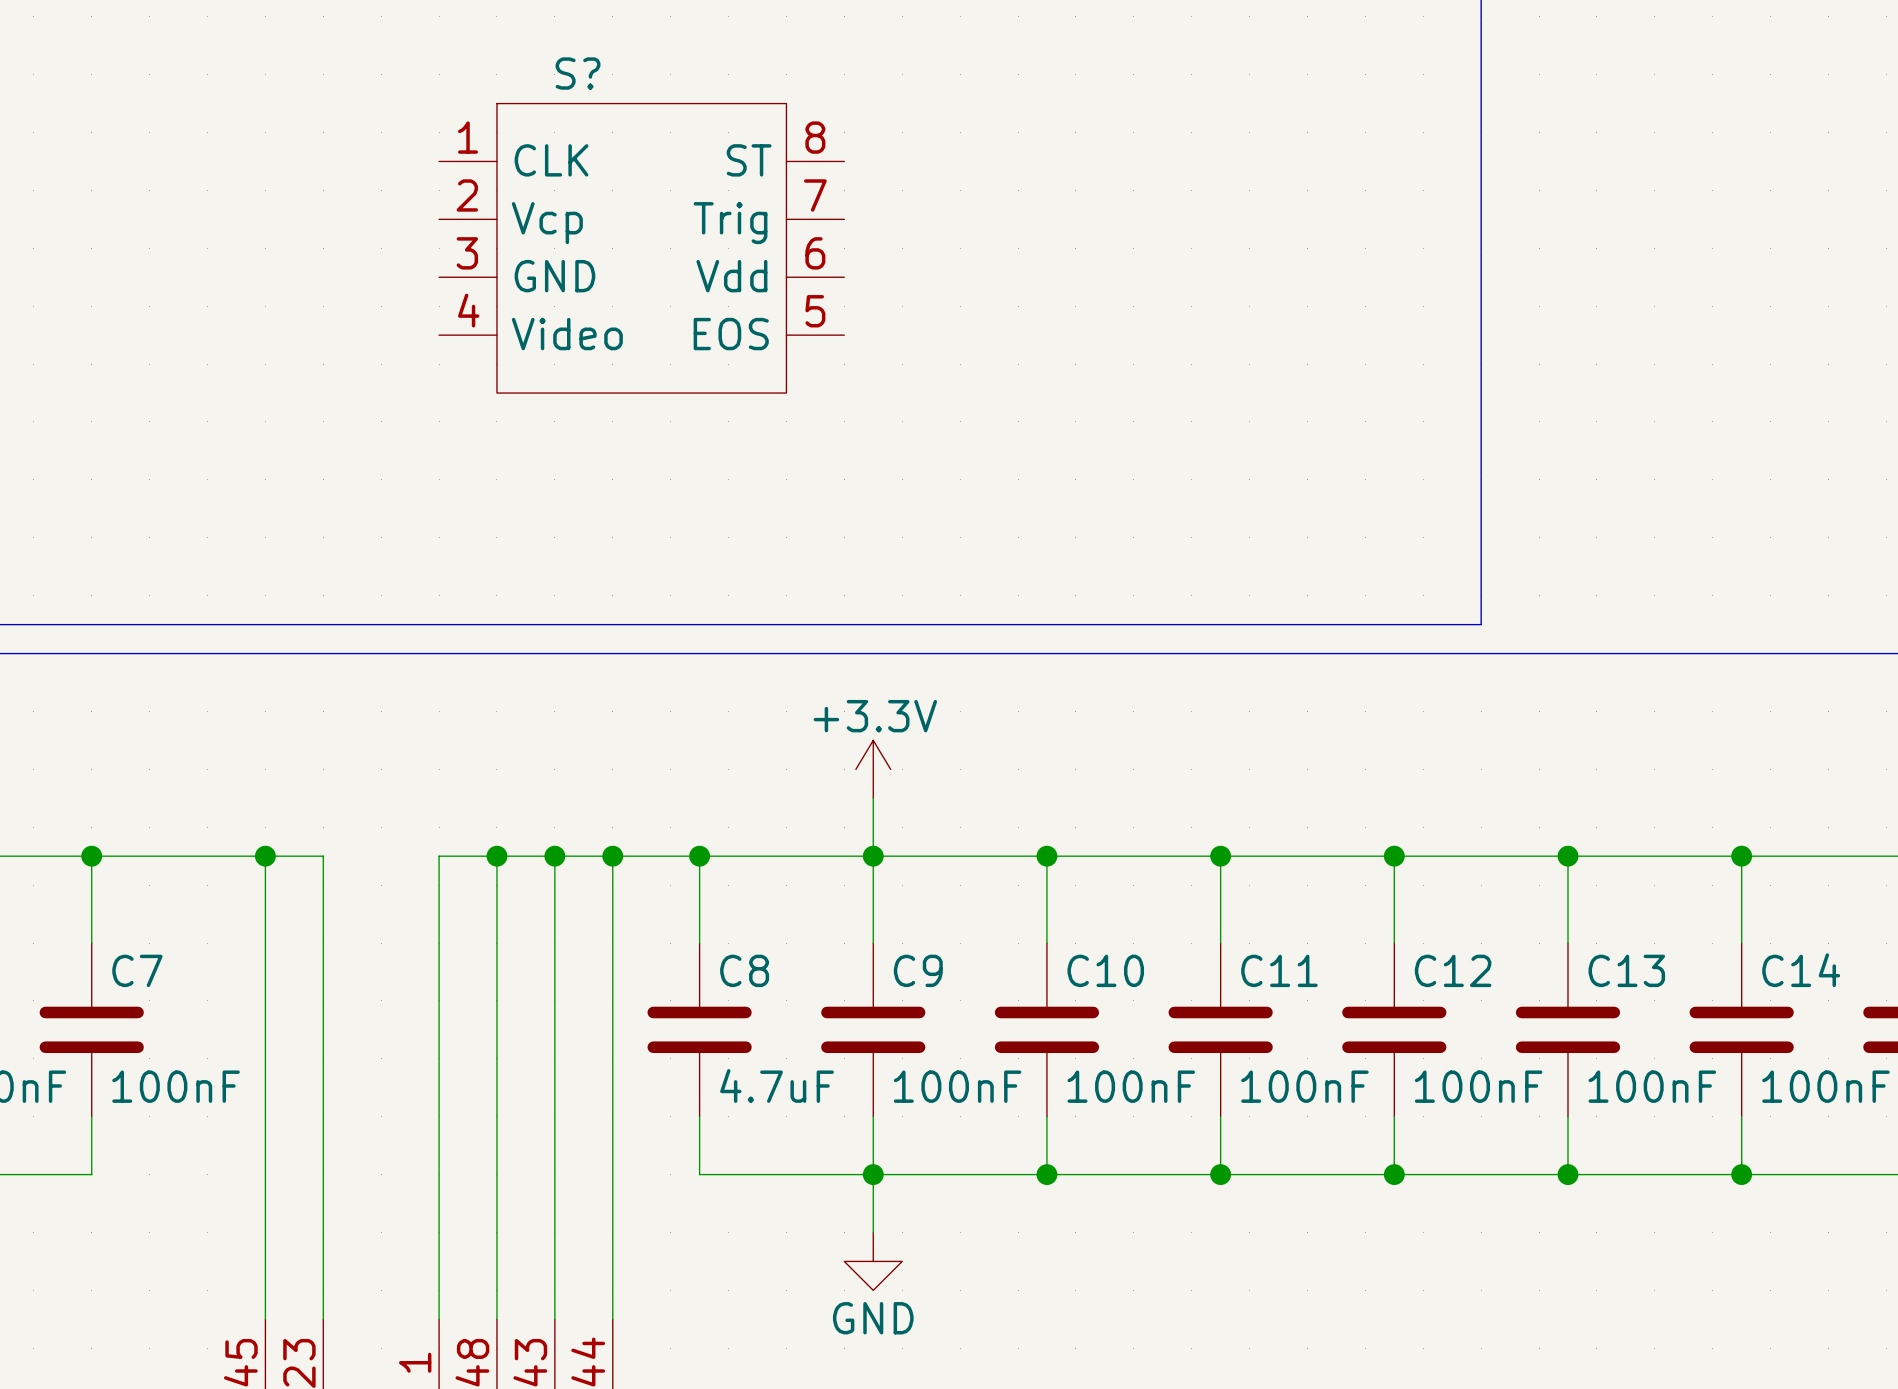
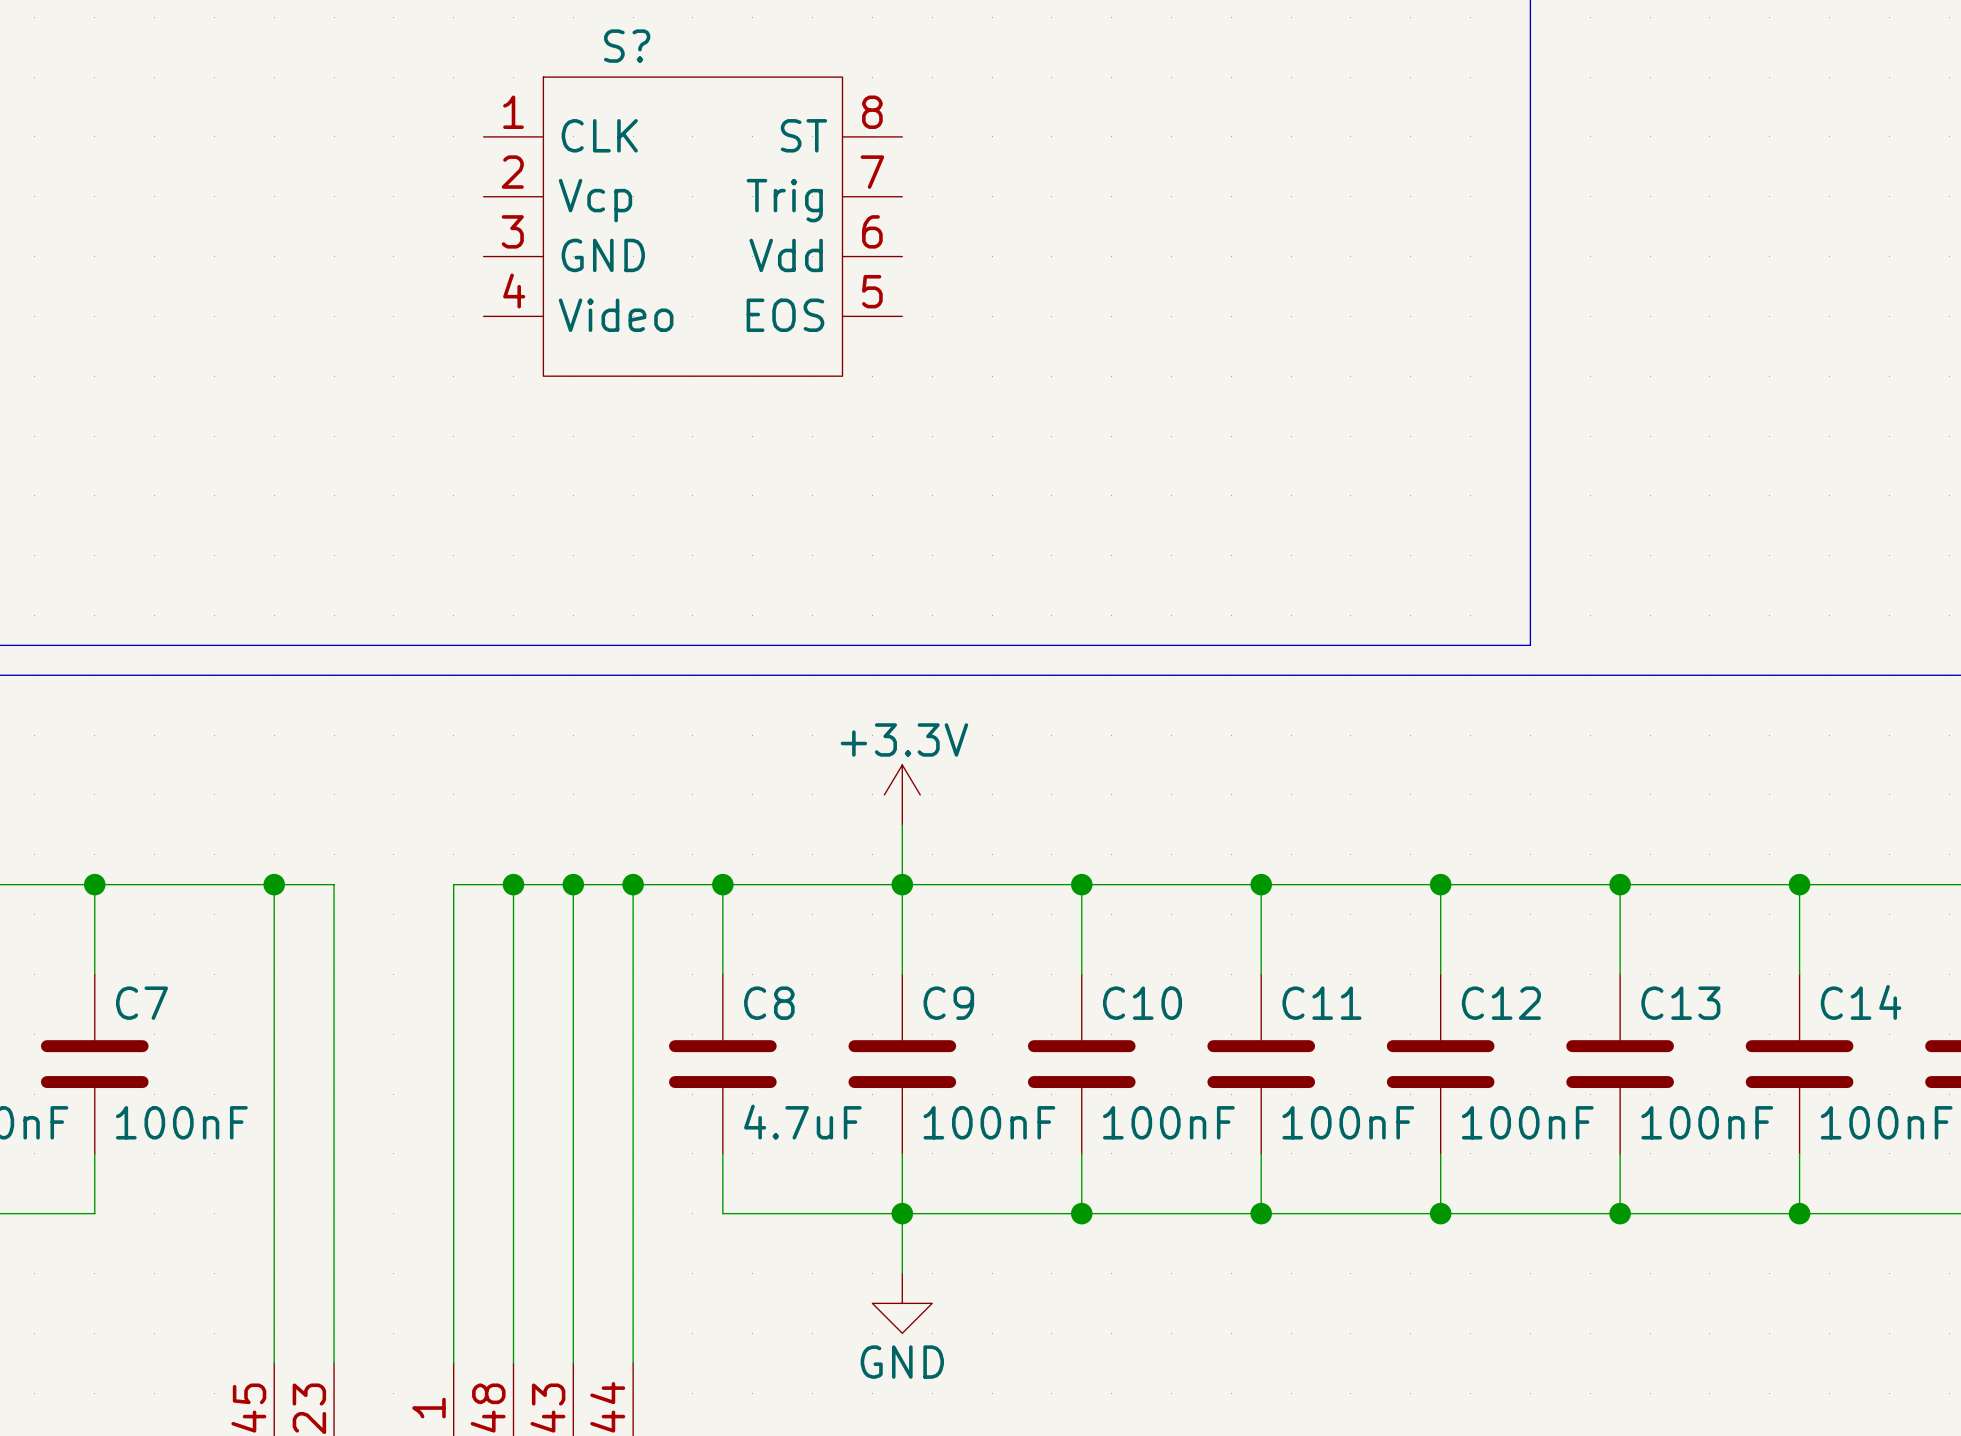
S? position: (641, 248) -> (692, 226)

